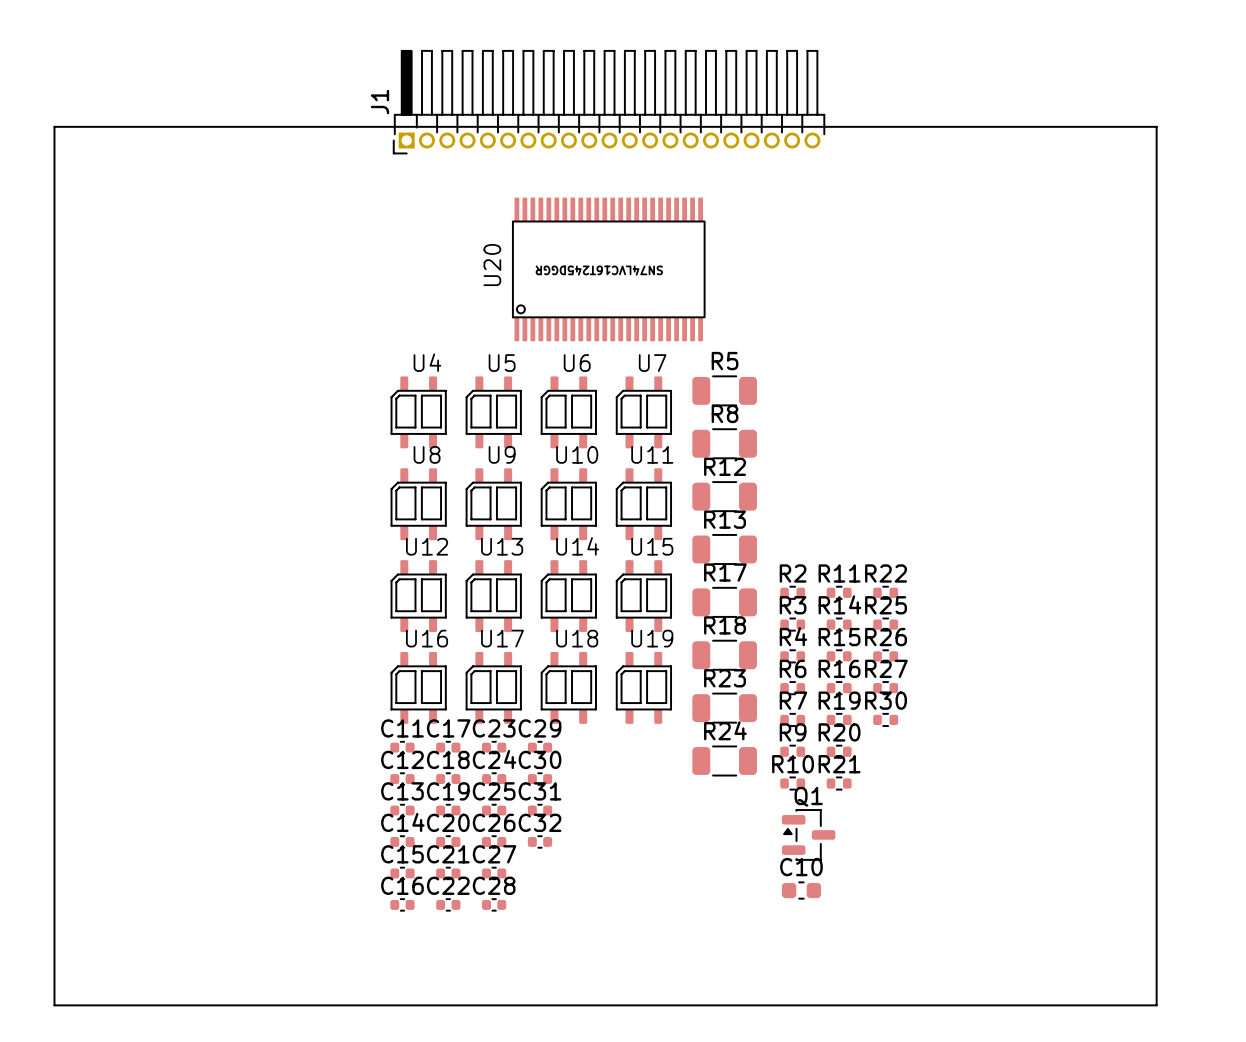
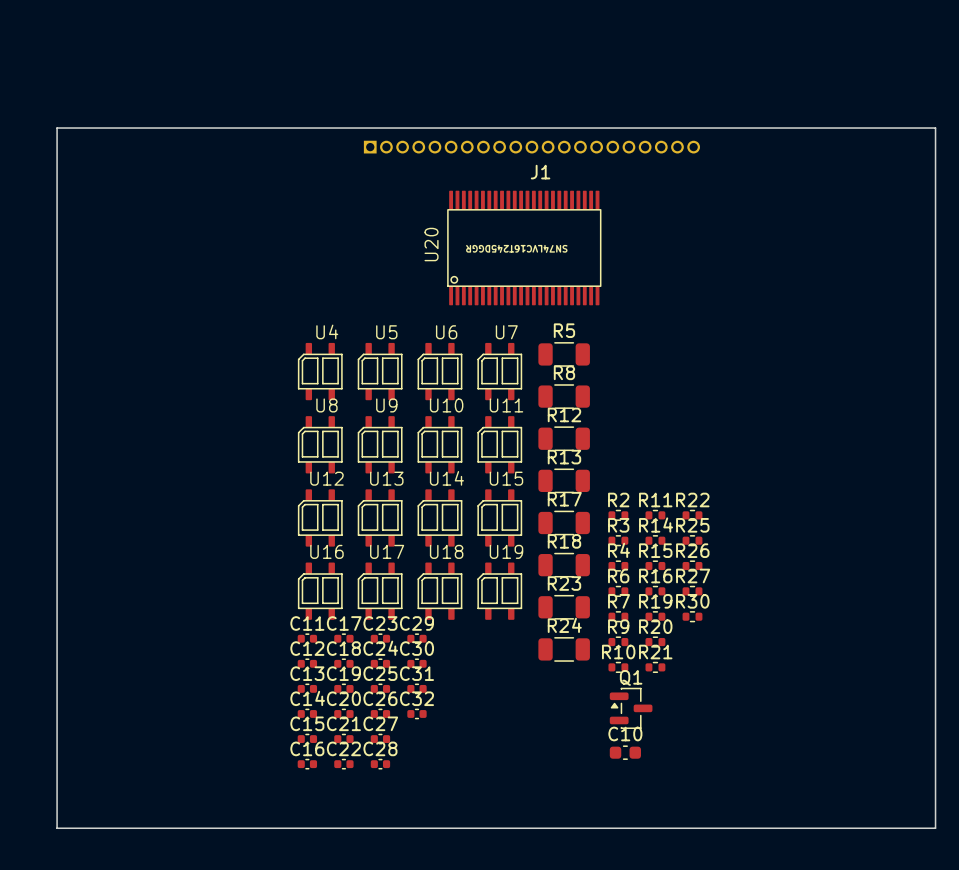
J1 footprint: [392, 49, 826, 155] -> [363, 140, 701, 154]
J1 name position: J1 (379, 102) -> J1 (540, 172)
board edge: (54, 126) (1156, 126) (1156, 1005) (54, 1005) (54, 126) -> (57, 128) (57, 828) (935, 828) (935, 128) (57, 128)
U20 position: (608, 269) -> (524, 248)

